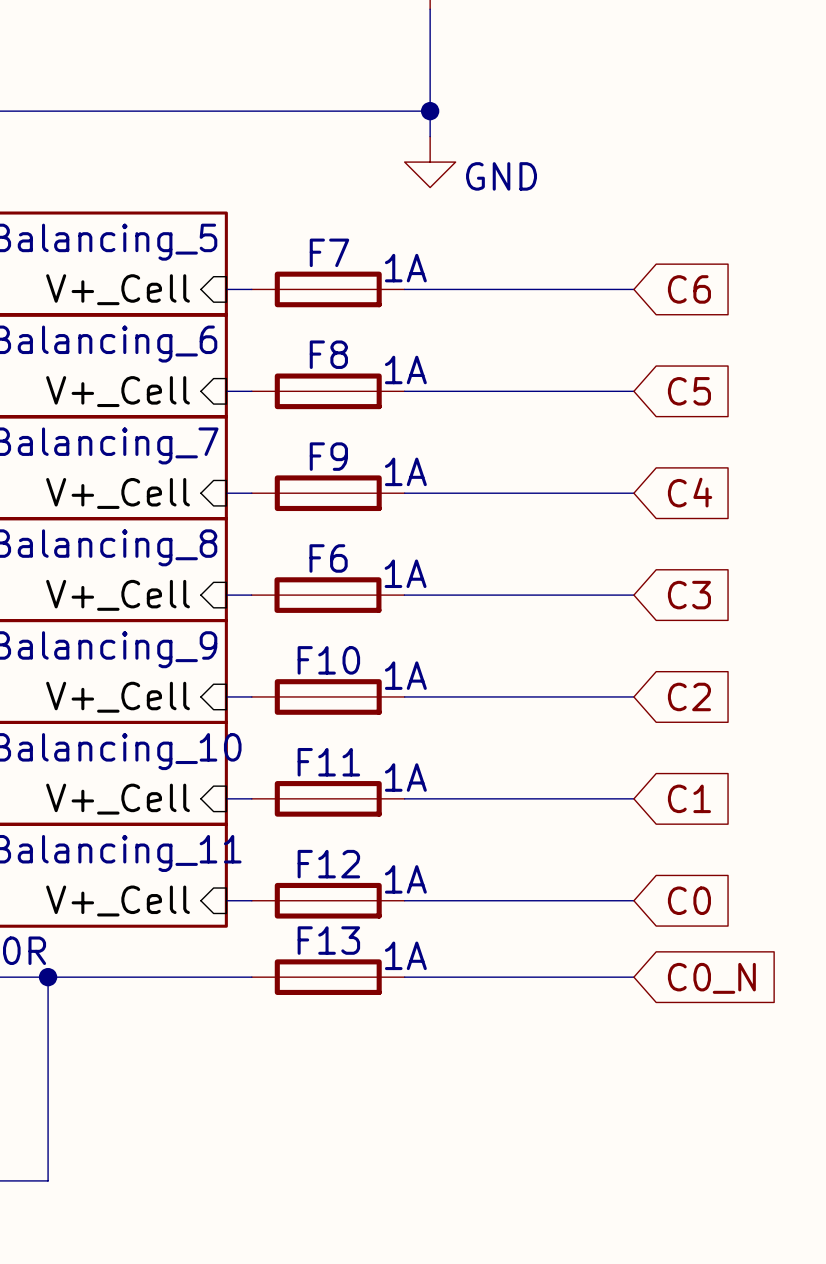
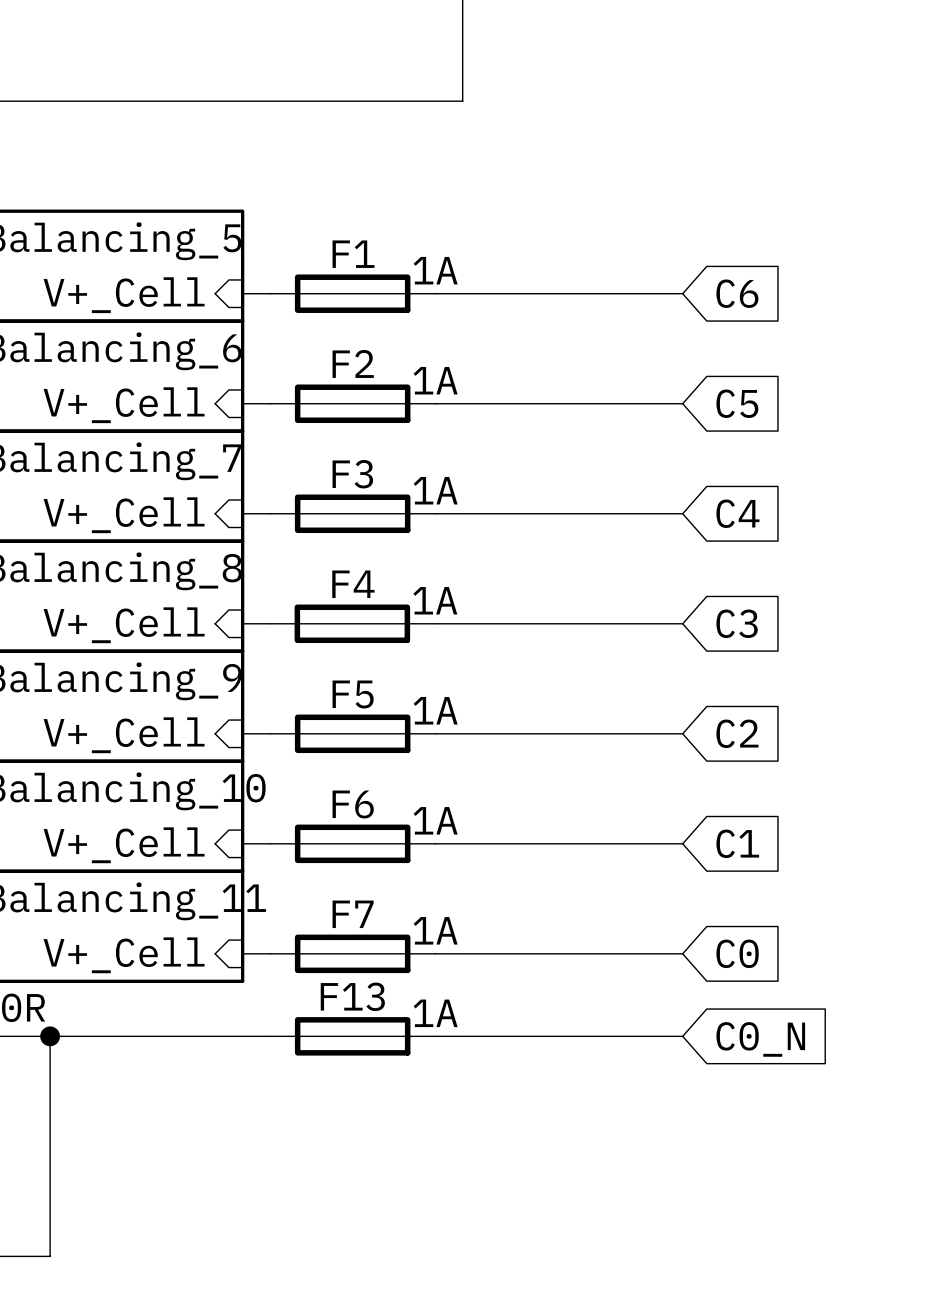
wire: (430, 111) (430, 136) -> none
junction: (430, 111) -> none
power symbol: GND (430, 162) -> none
F7 name: F7 (329, 252) -> F1 (353, 254)
F8 name: F8 (328, 354) -> F2 (353, 363)
F9 name: F9 (328, 456) -> F3 (352, 474)
F6 name: F6 (328, 558) -> F4 (353, 584)
F10 name: F10 (328, 660) -> F5 (353, 694)
F11 name: F11 (328, 762) -> F6 (353, 804)
F12 name: F12 (328, 864) -> F7 (353, 914)

